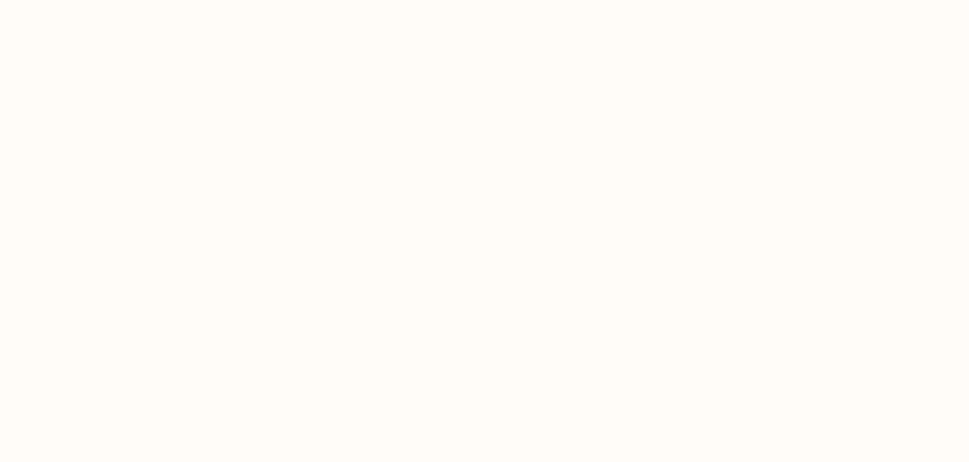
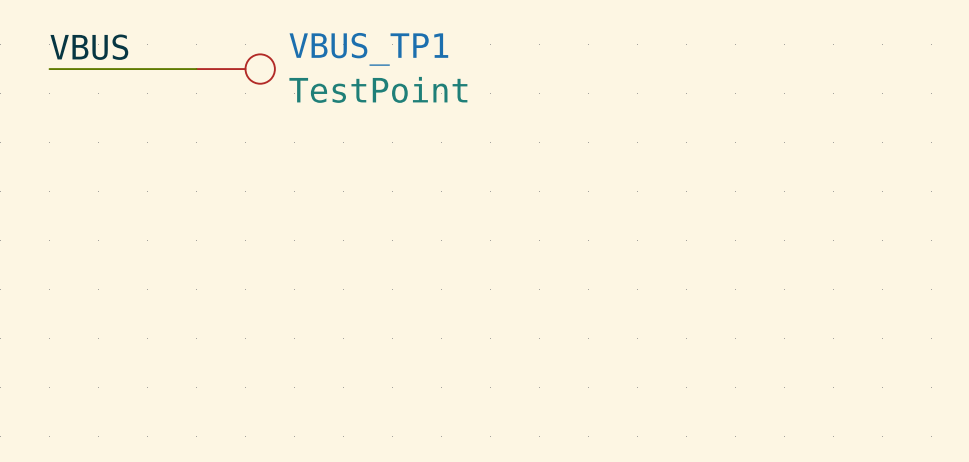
label: none -> VBUS (89, 47)
wire: none -> (49, 69) (196, 69)
VBUS_TP1: none -> TestPoint (235, 69)

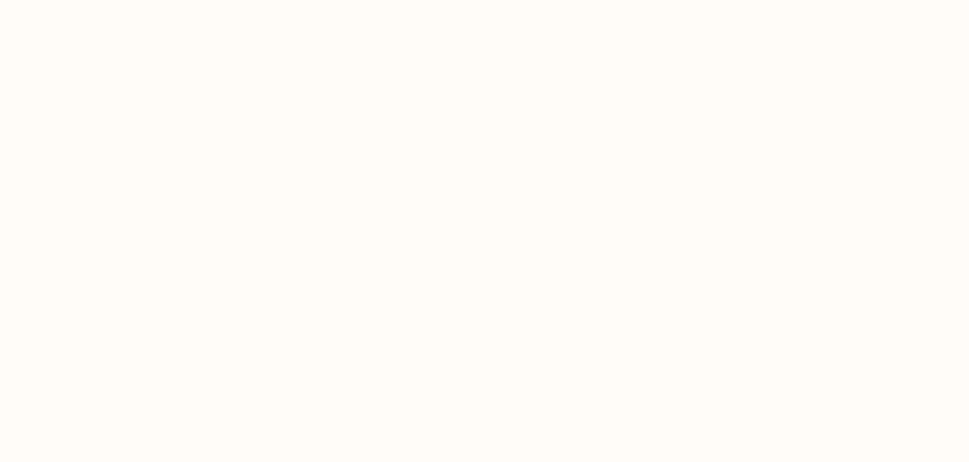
label: VBUS (89, 47) -> none
wire: (49, 69) (196, 69) -> none
VBUS_TP1: TestPoint (235, 69) -> none

